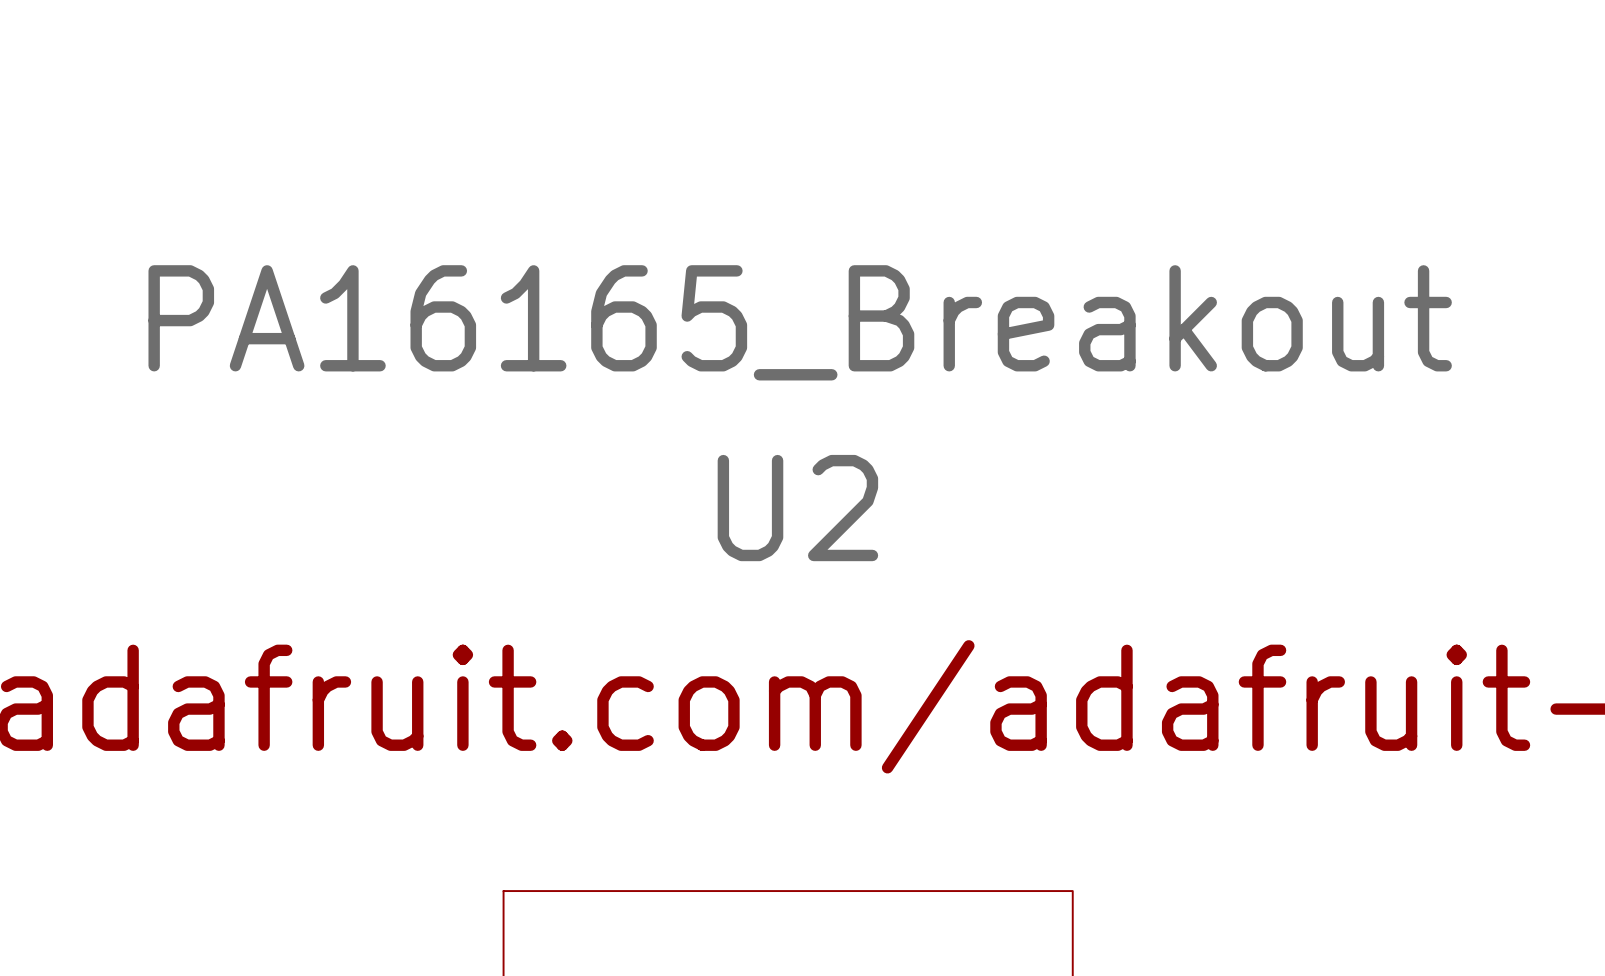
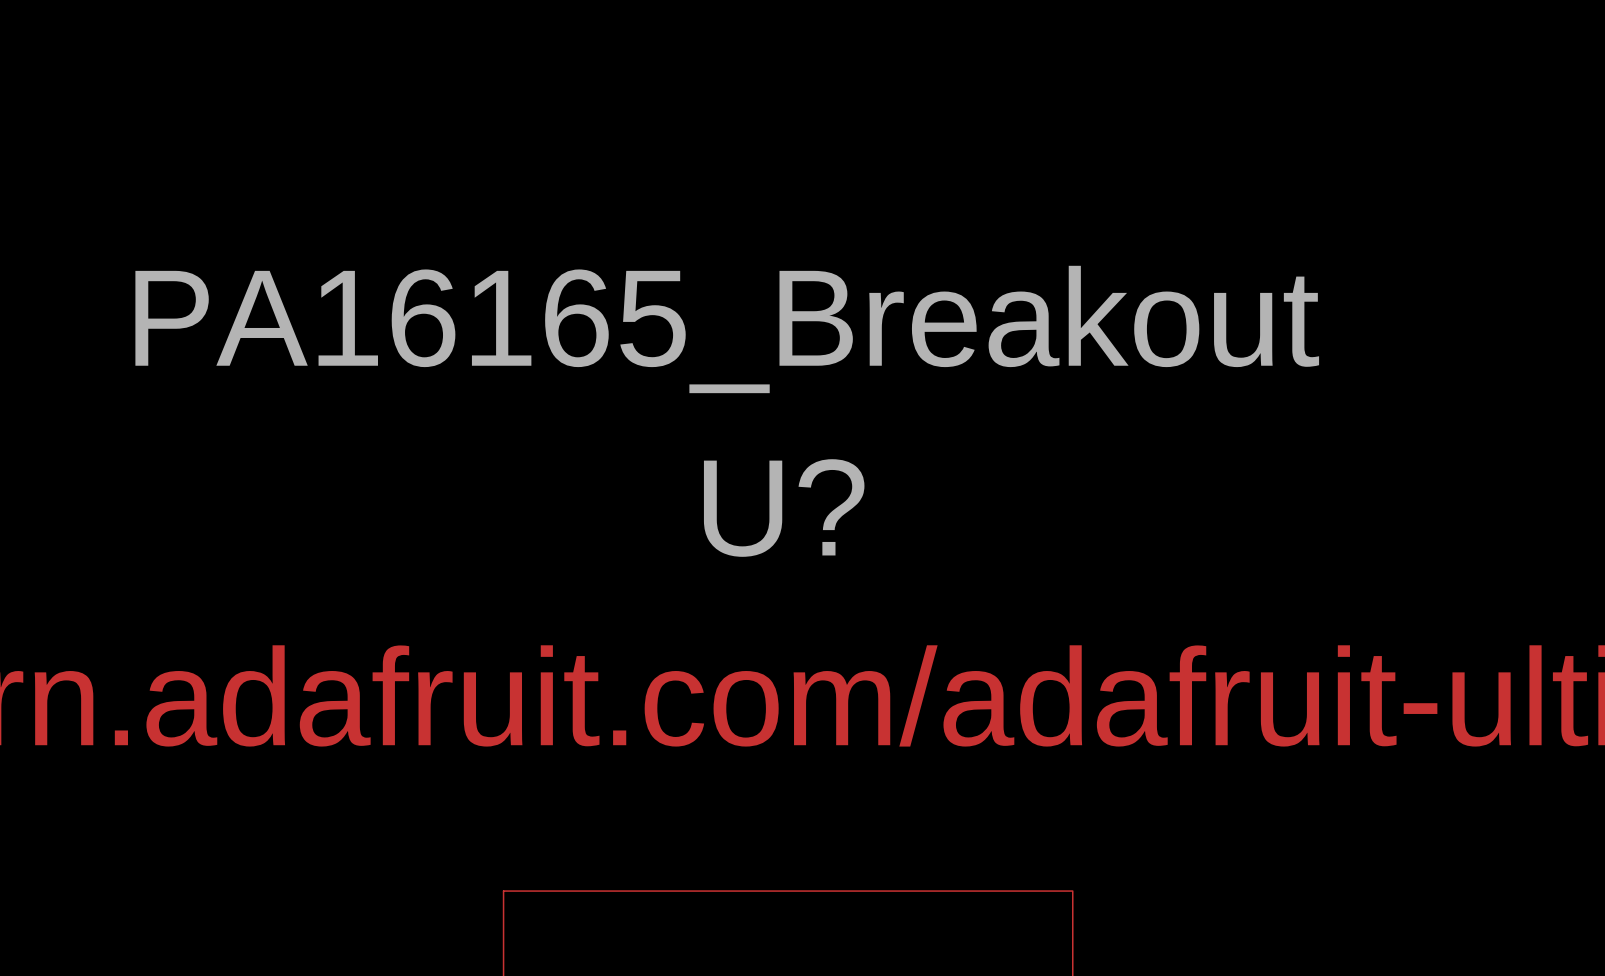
U2 name: U2 (797, 508) -> U? (784, 508)

